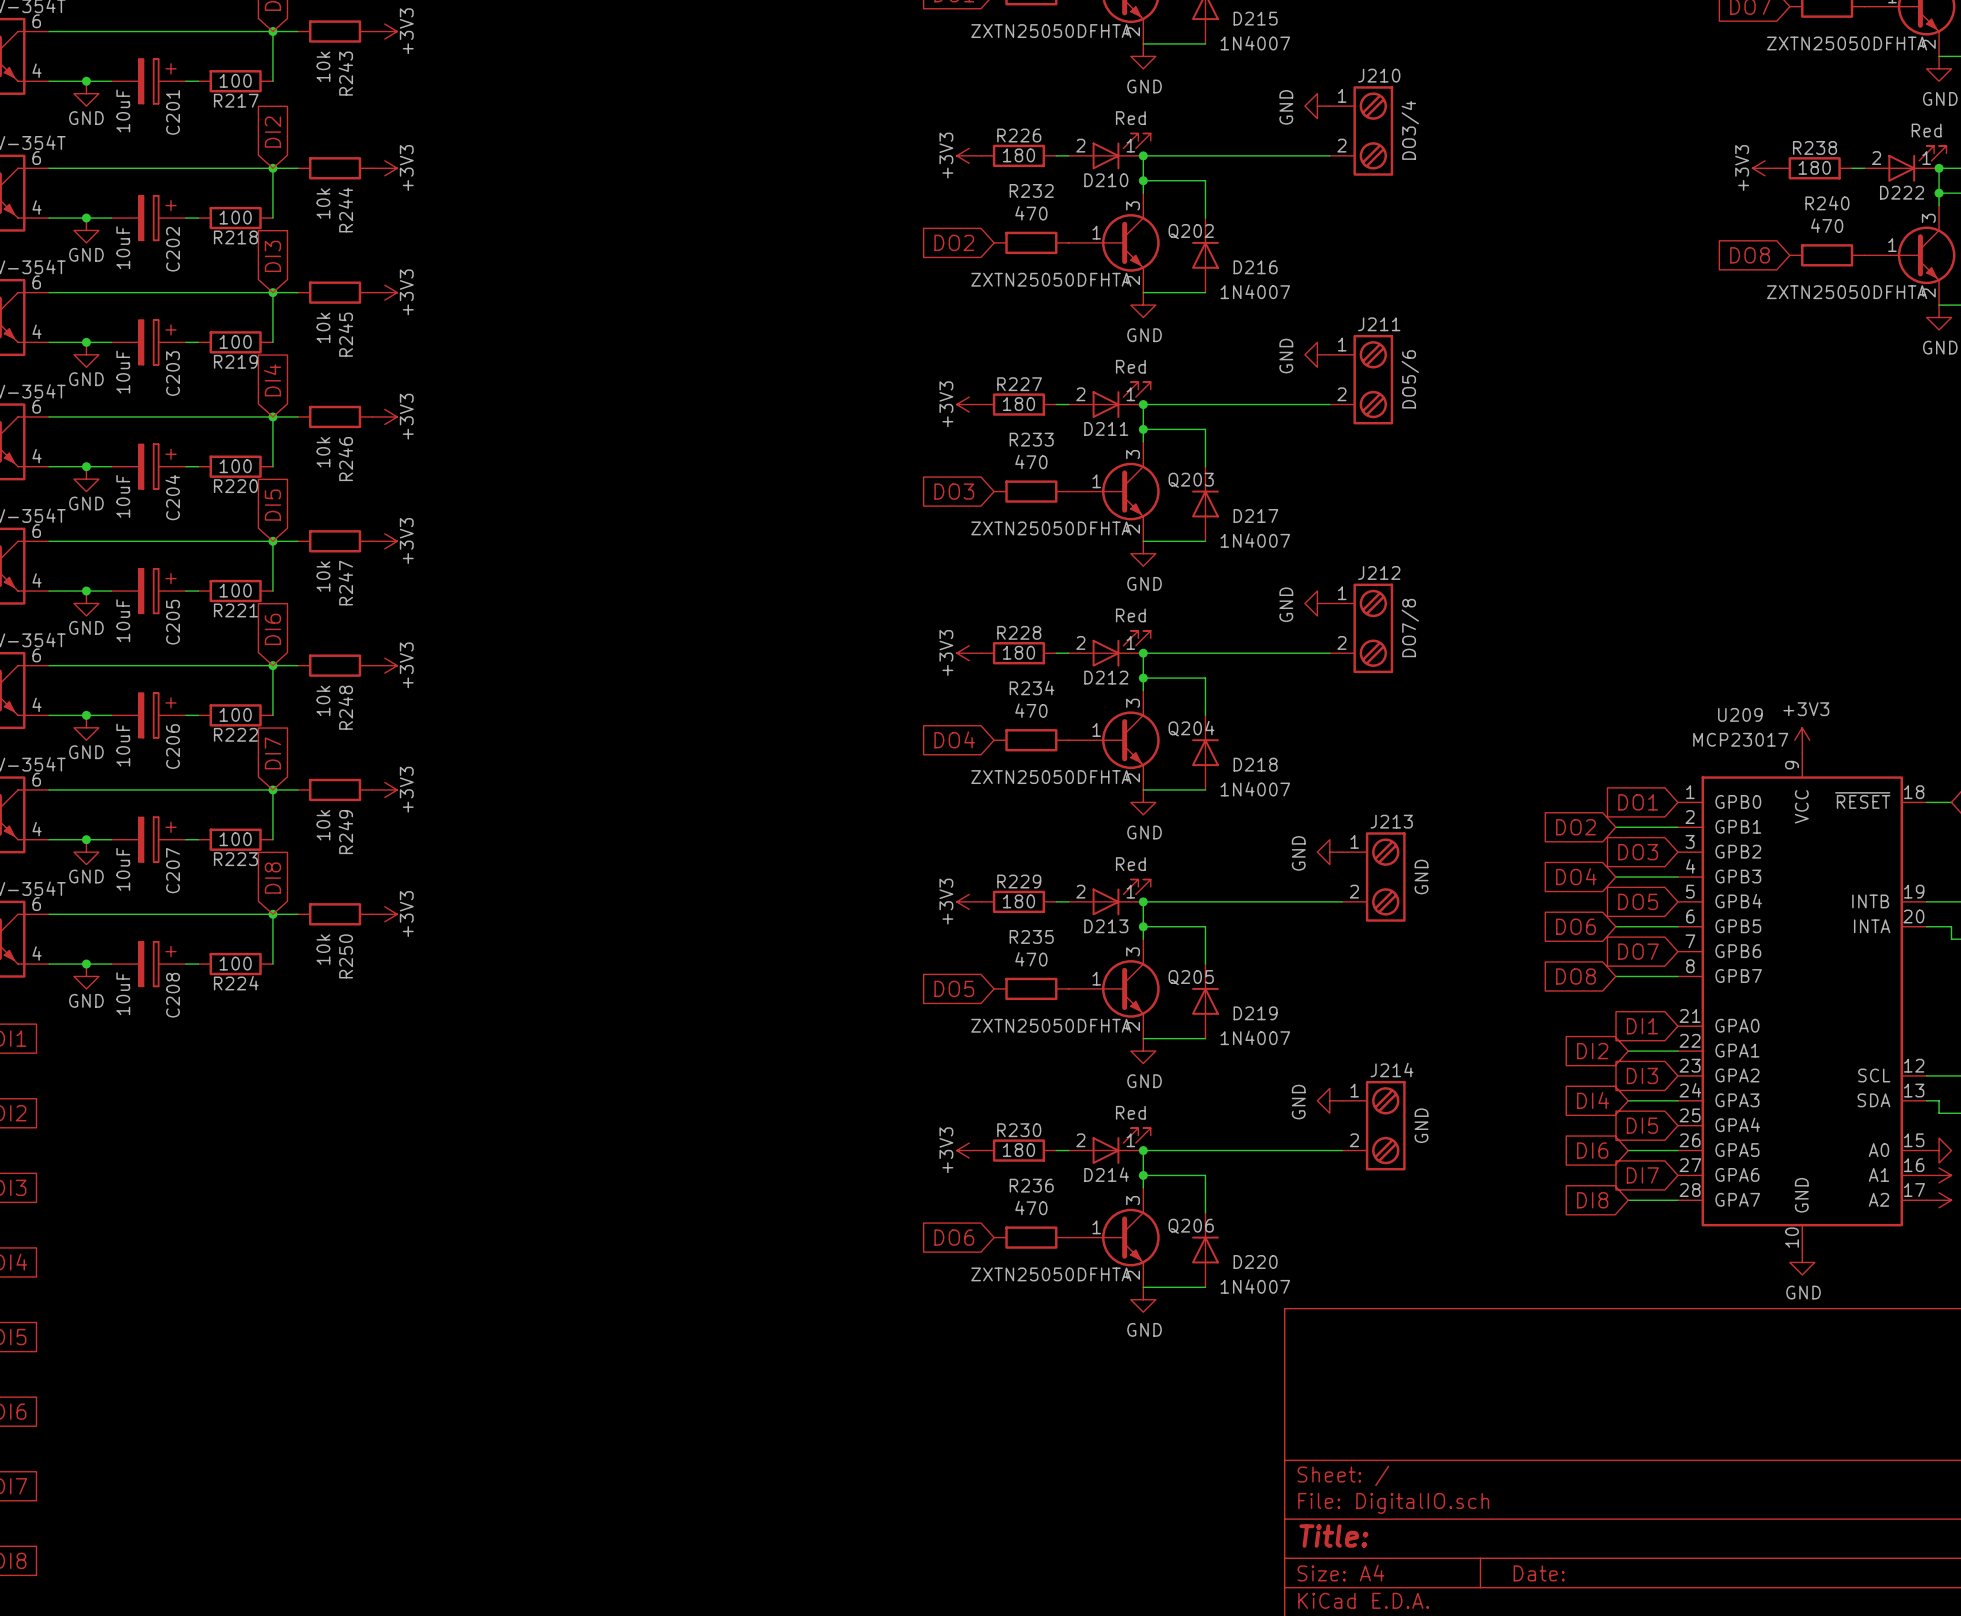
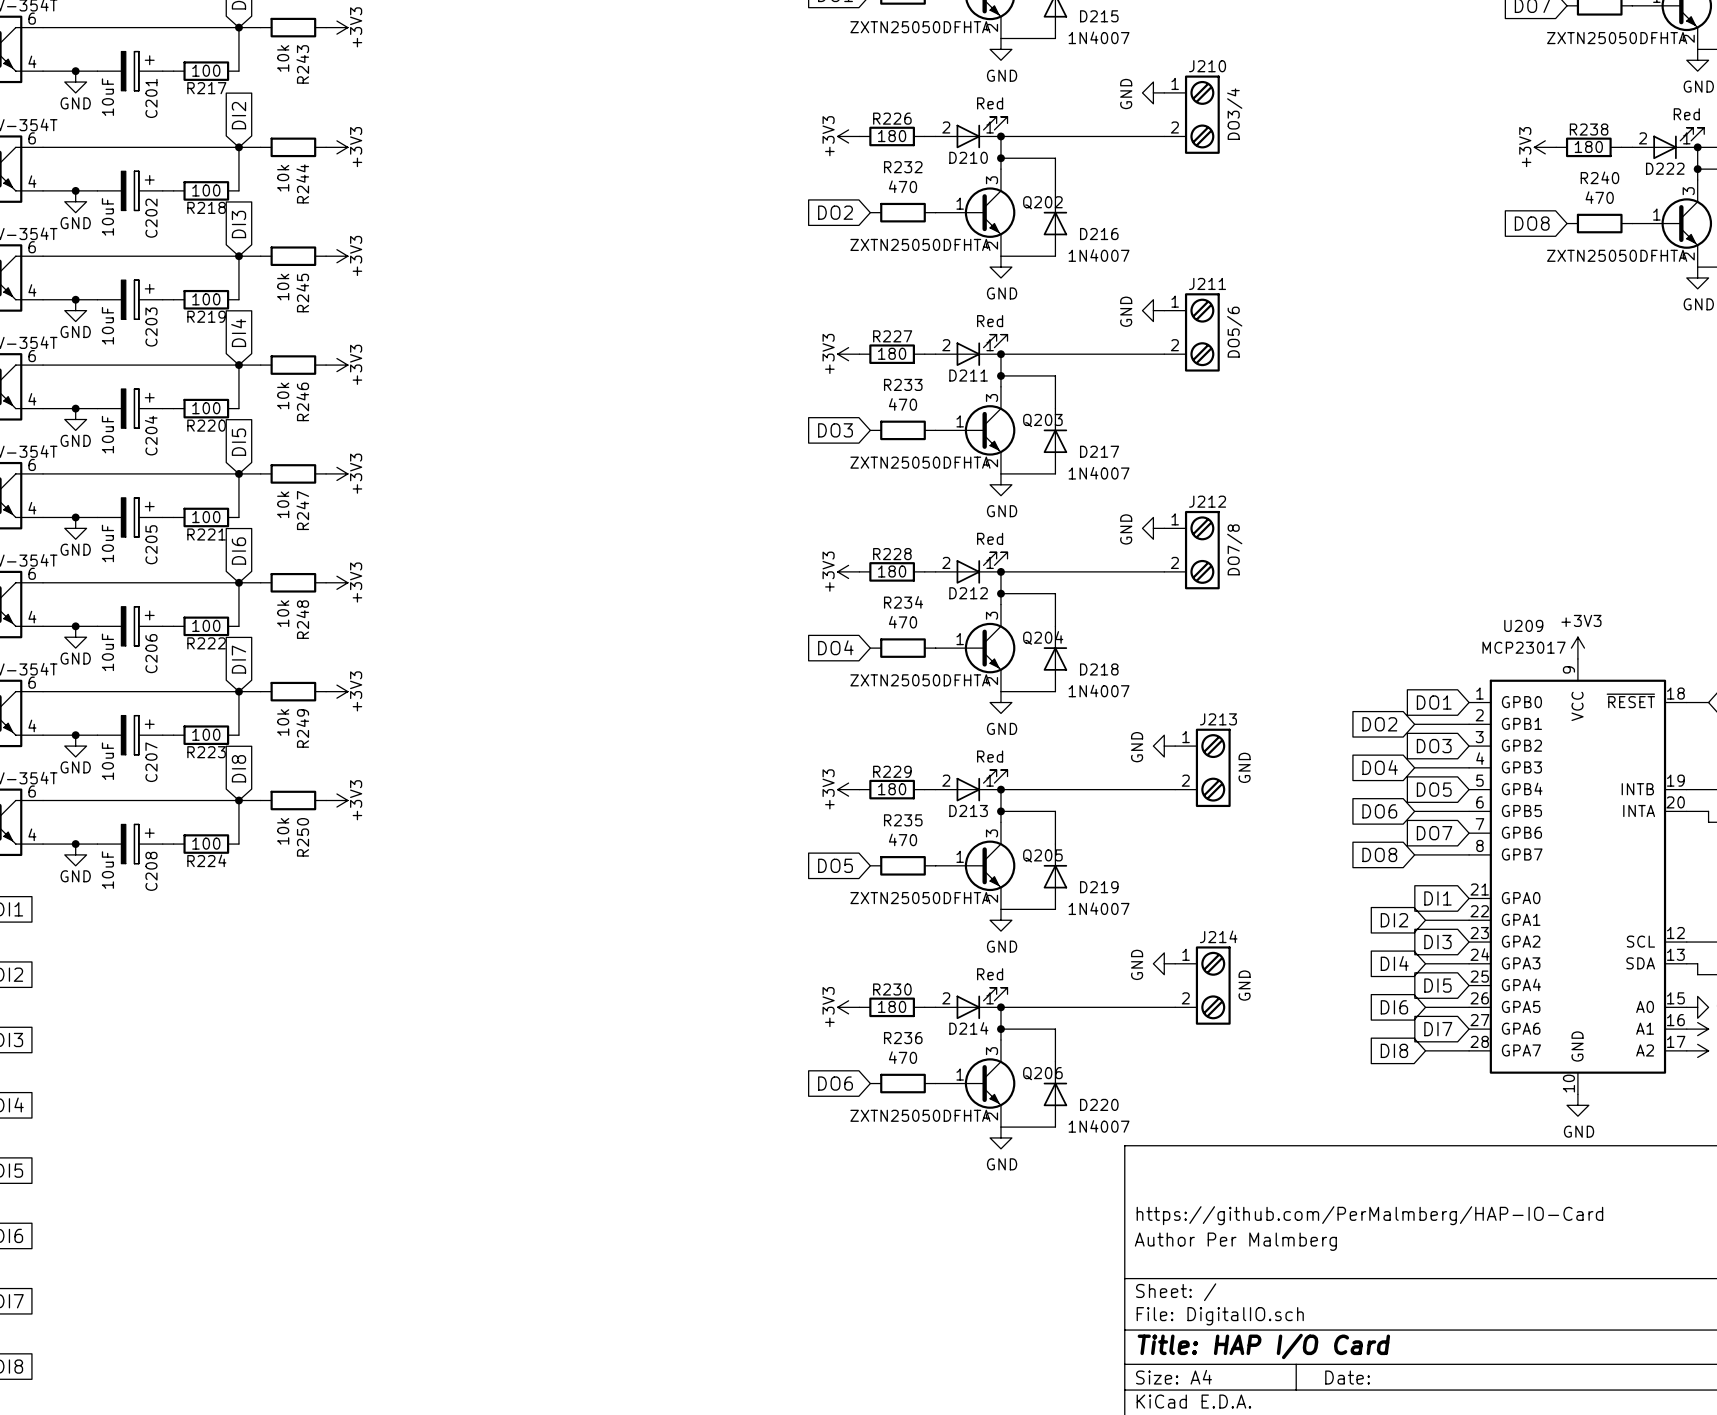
title block: none -> https://github.com/PerMalmberg/HAP-IO-Card (1369, 1215)
title block: none -> Author Per Malmberg (1235, 1241)
title block: Title: (1333, 1536) -> Title: HAP I/O Card (1263, 1346)

